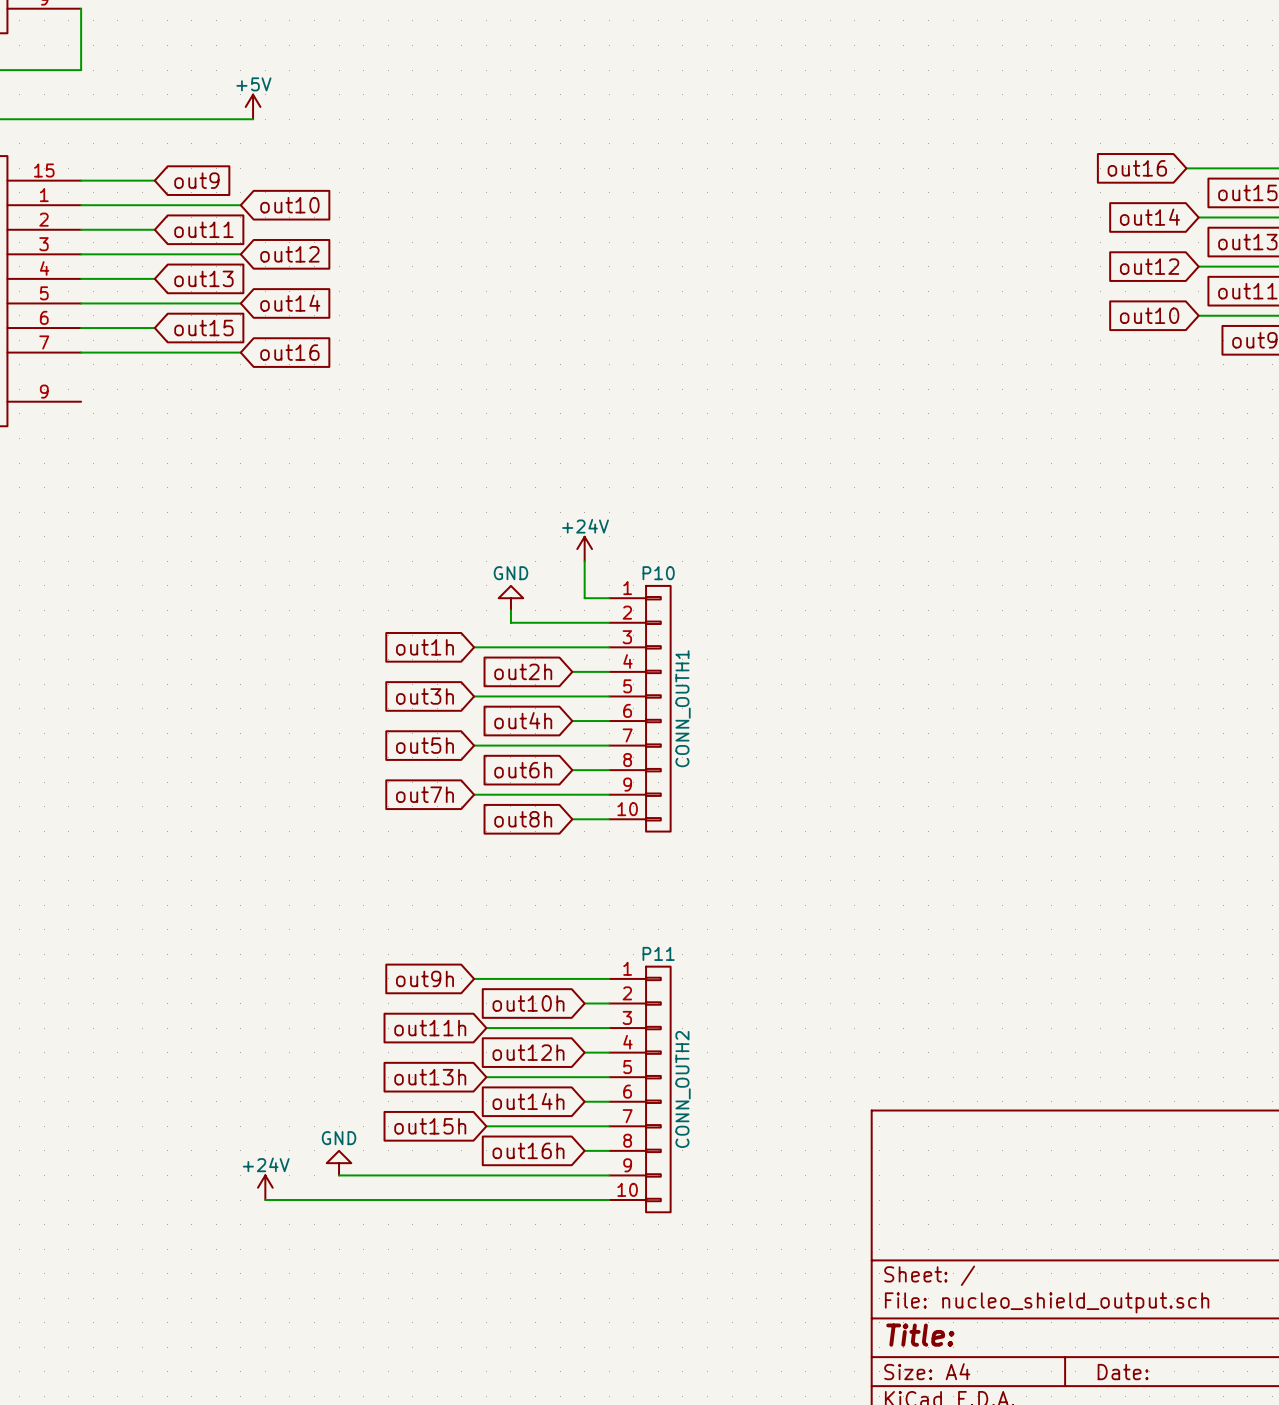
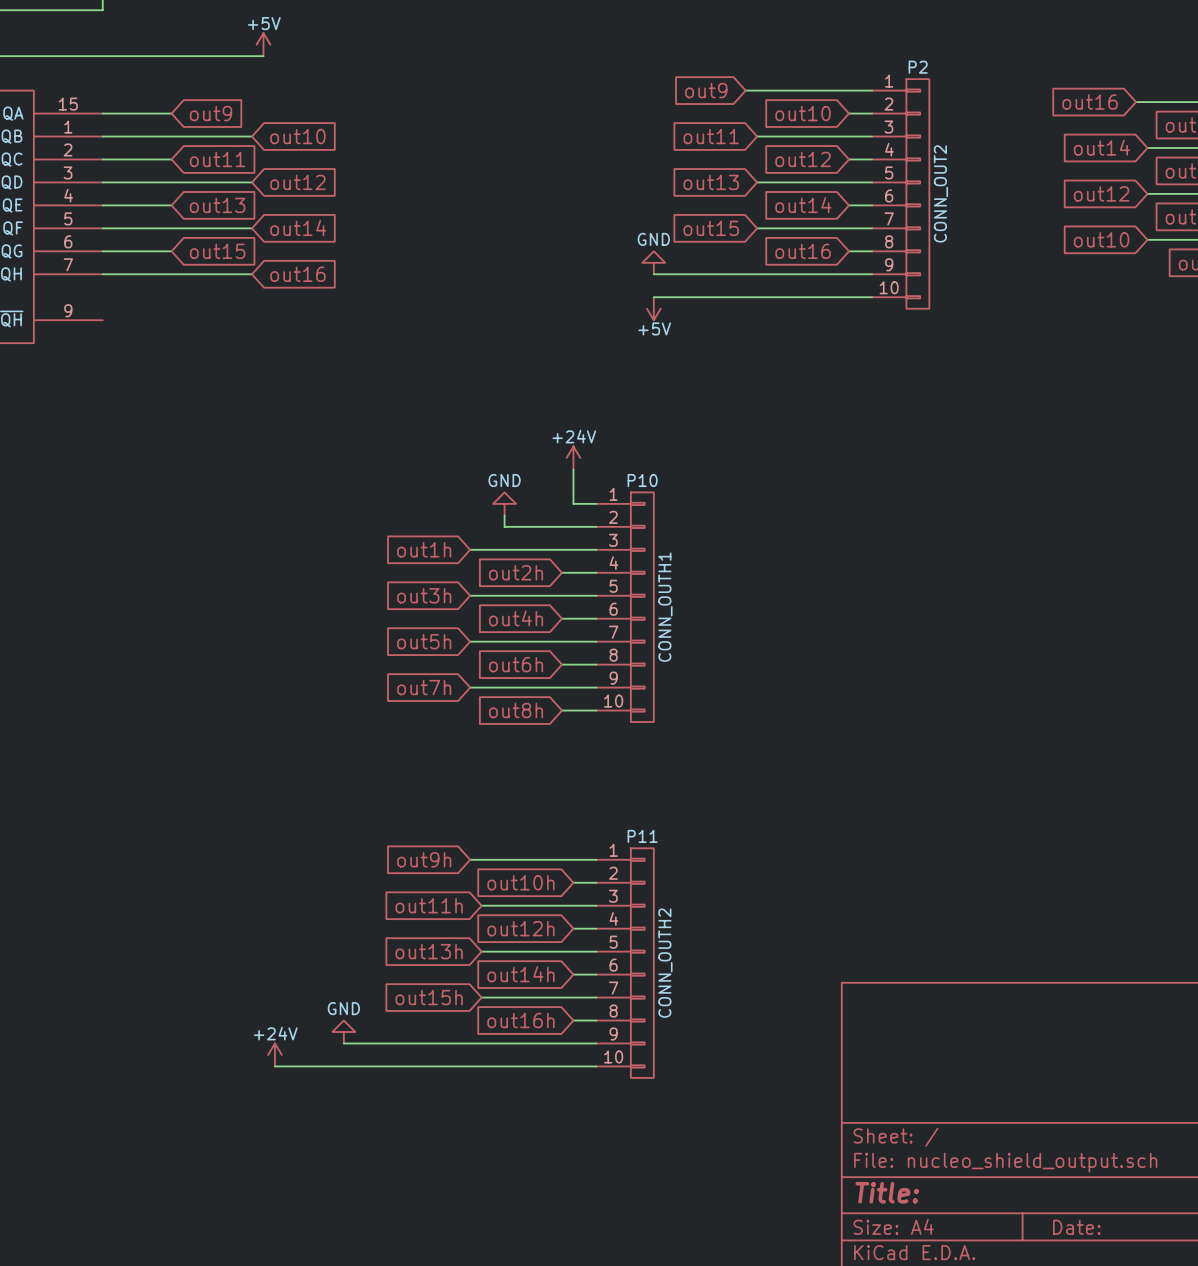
global label: none -> out9 (706, 90)
wire: none -> (745, 90) (871, 90)
global label: none -> out10 (803, 113)
wire: none -> (849, 113) (871, 113)
global label: none -> out11 (711, 136)
wire: none -> (757, 136) (871, 136)
global label: none -> out12 (803, 159)
wire: none -> (849, 159) (871, 159)
global label: none -> out13 (711, 182)
wire: none -> (757, 182) (871, 182)
P2: none -> CONN_OUT2 (900, 193)
global label: none -> out14 (803, 205)
wire: none -> (849, 205) (871, 205)
global label: none -> out15 (711, 228)
wire: none -> (757, 228) (871, 228)
global label: none -> out16 (803, 251)
wire: none -> (849, 251) (871, 251)
power symbol: none -> GND (653, 262)
wire: none -> (653, 274) (871, 274)
wire: none -> (653, 297) (871, 297)
power symbol: none -> +5V (653, 308)

